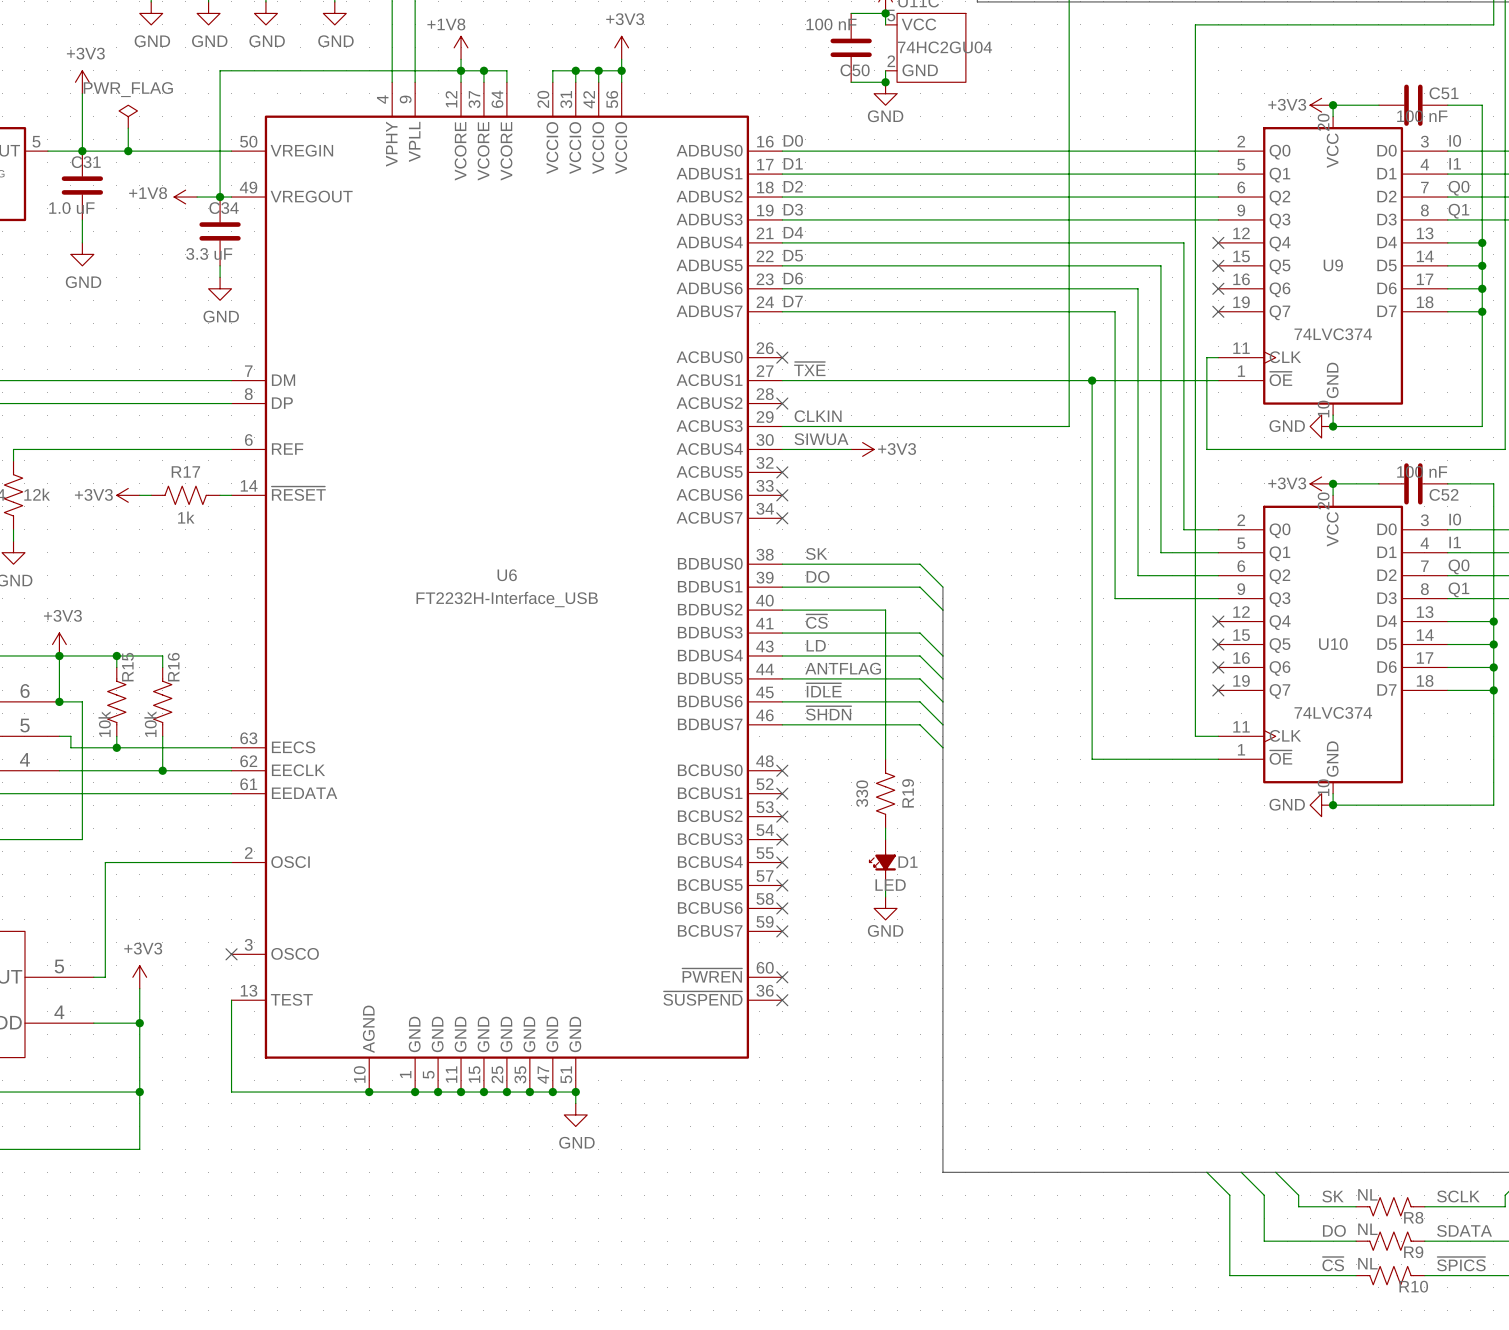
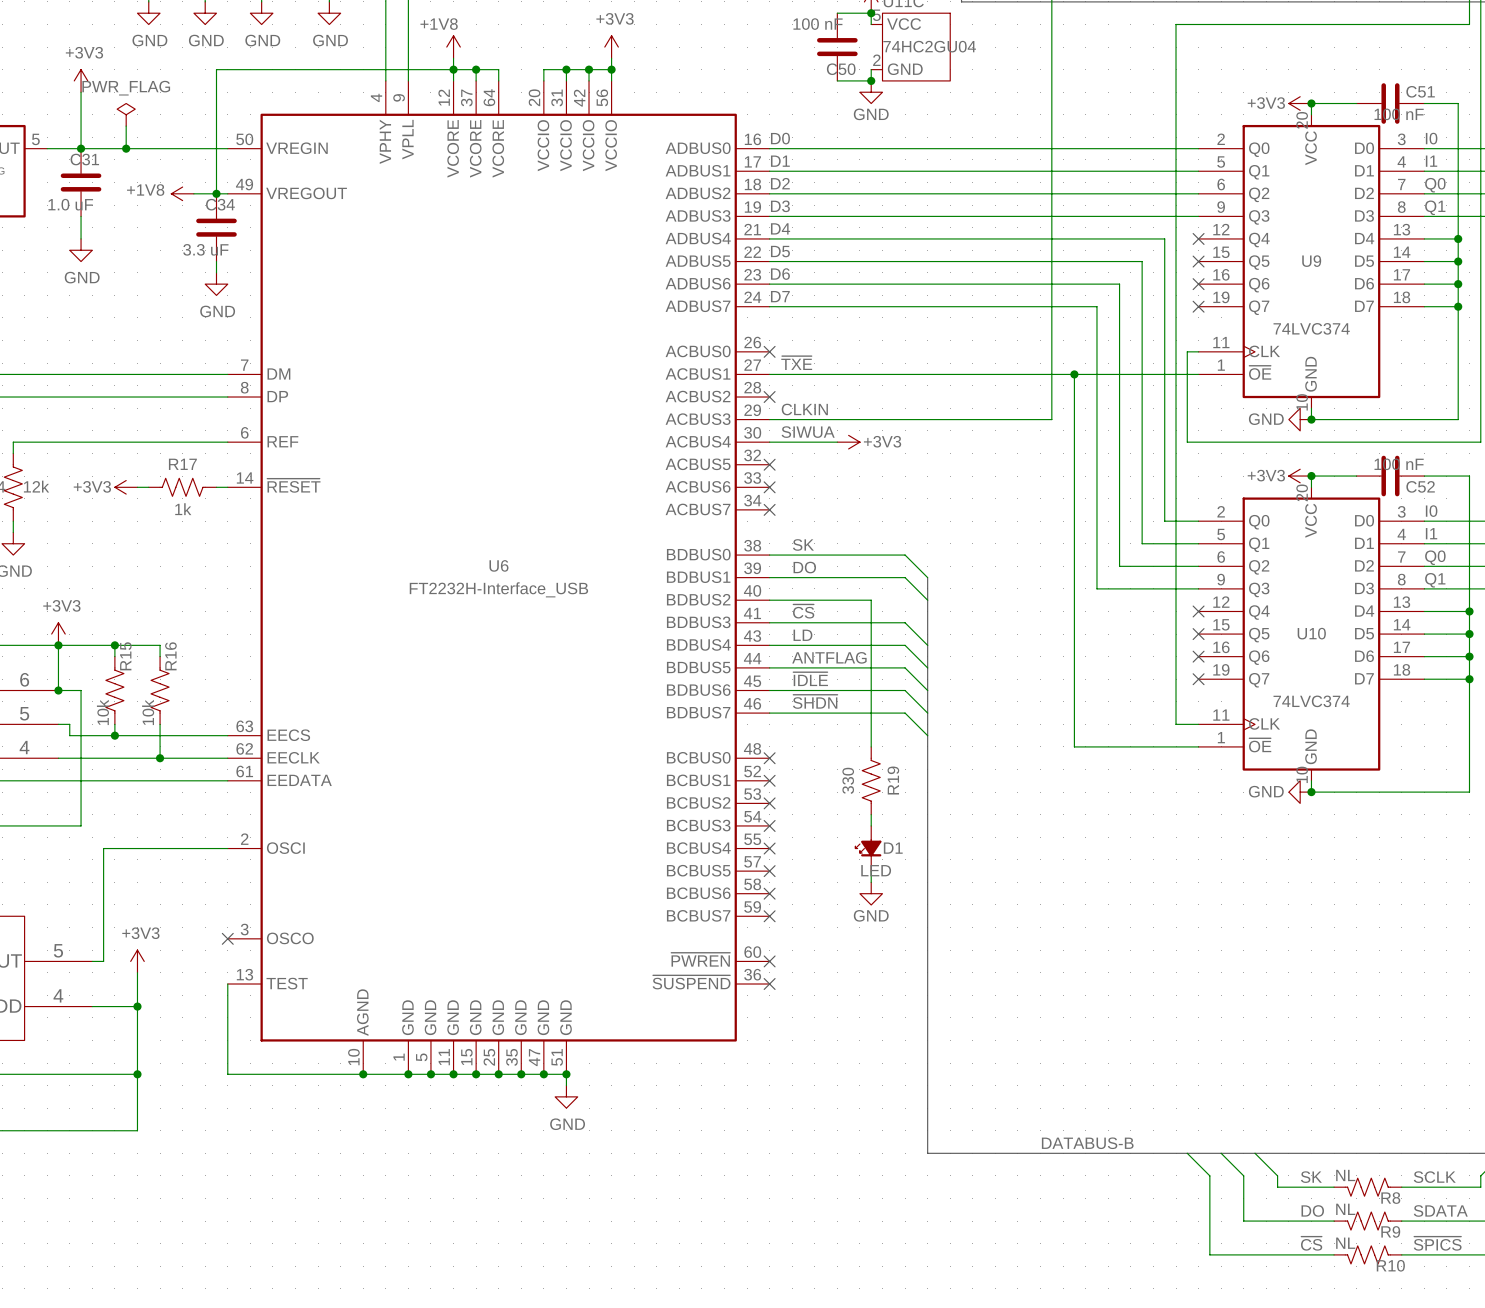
label: none -> DATABUS-B (1087, 1143)

